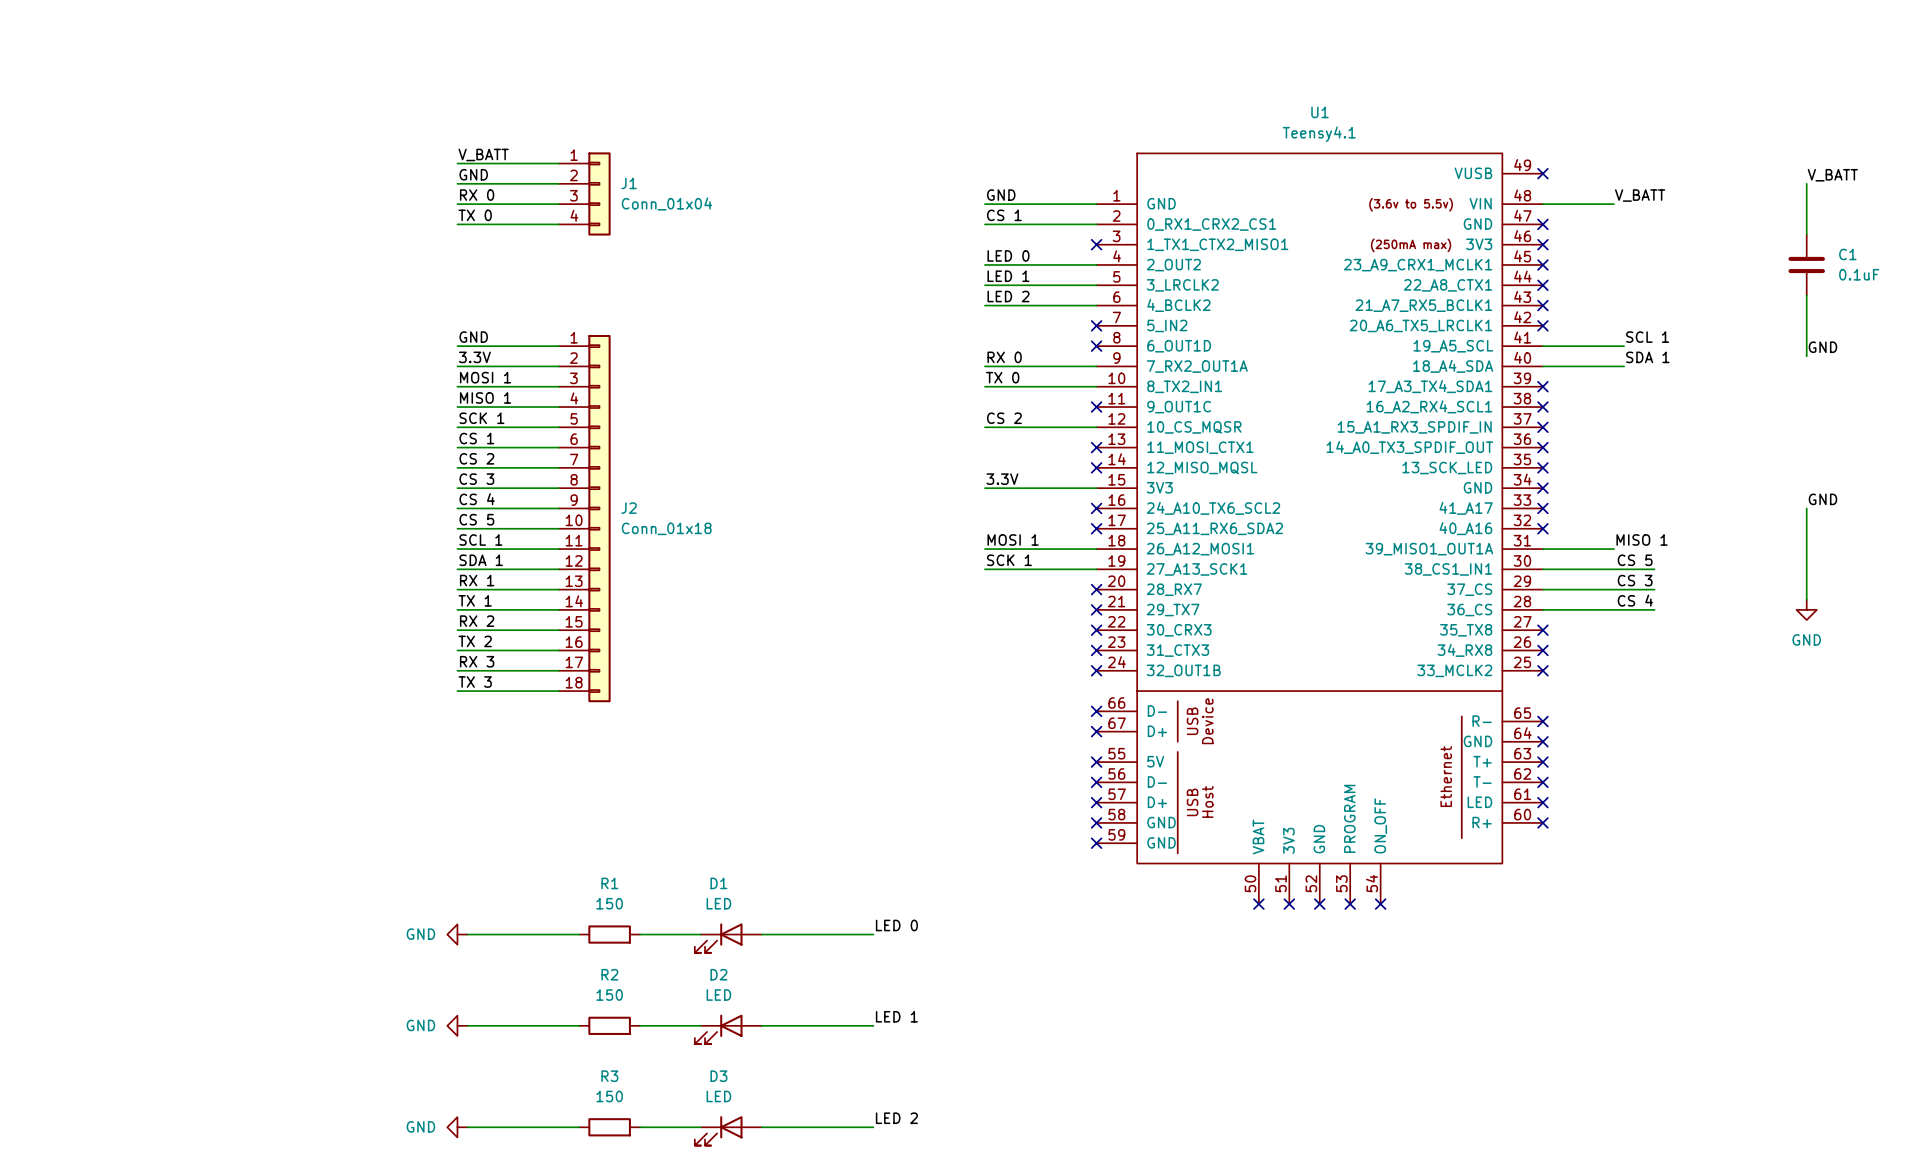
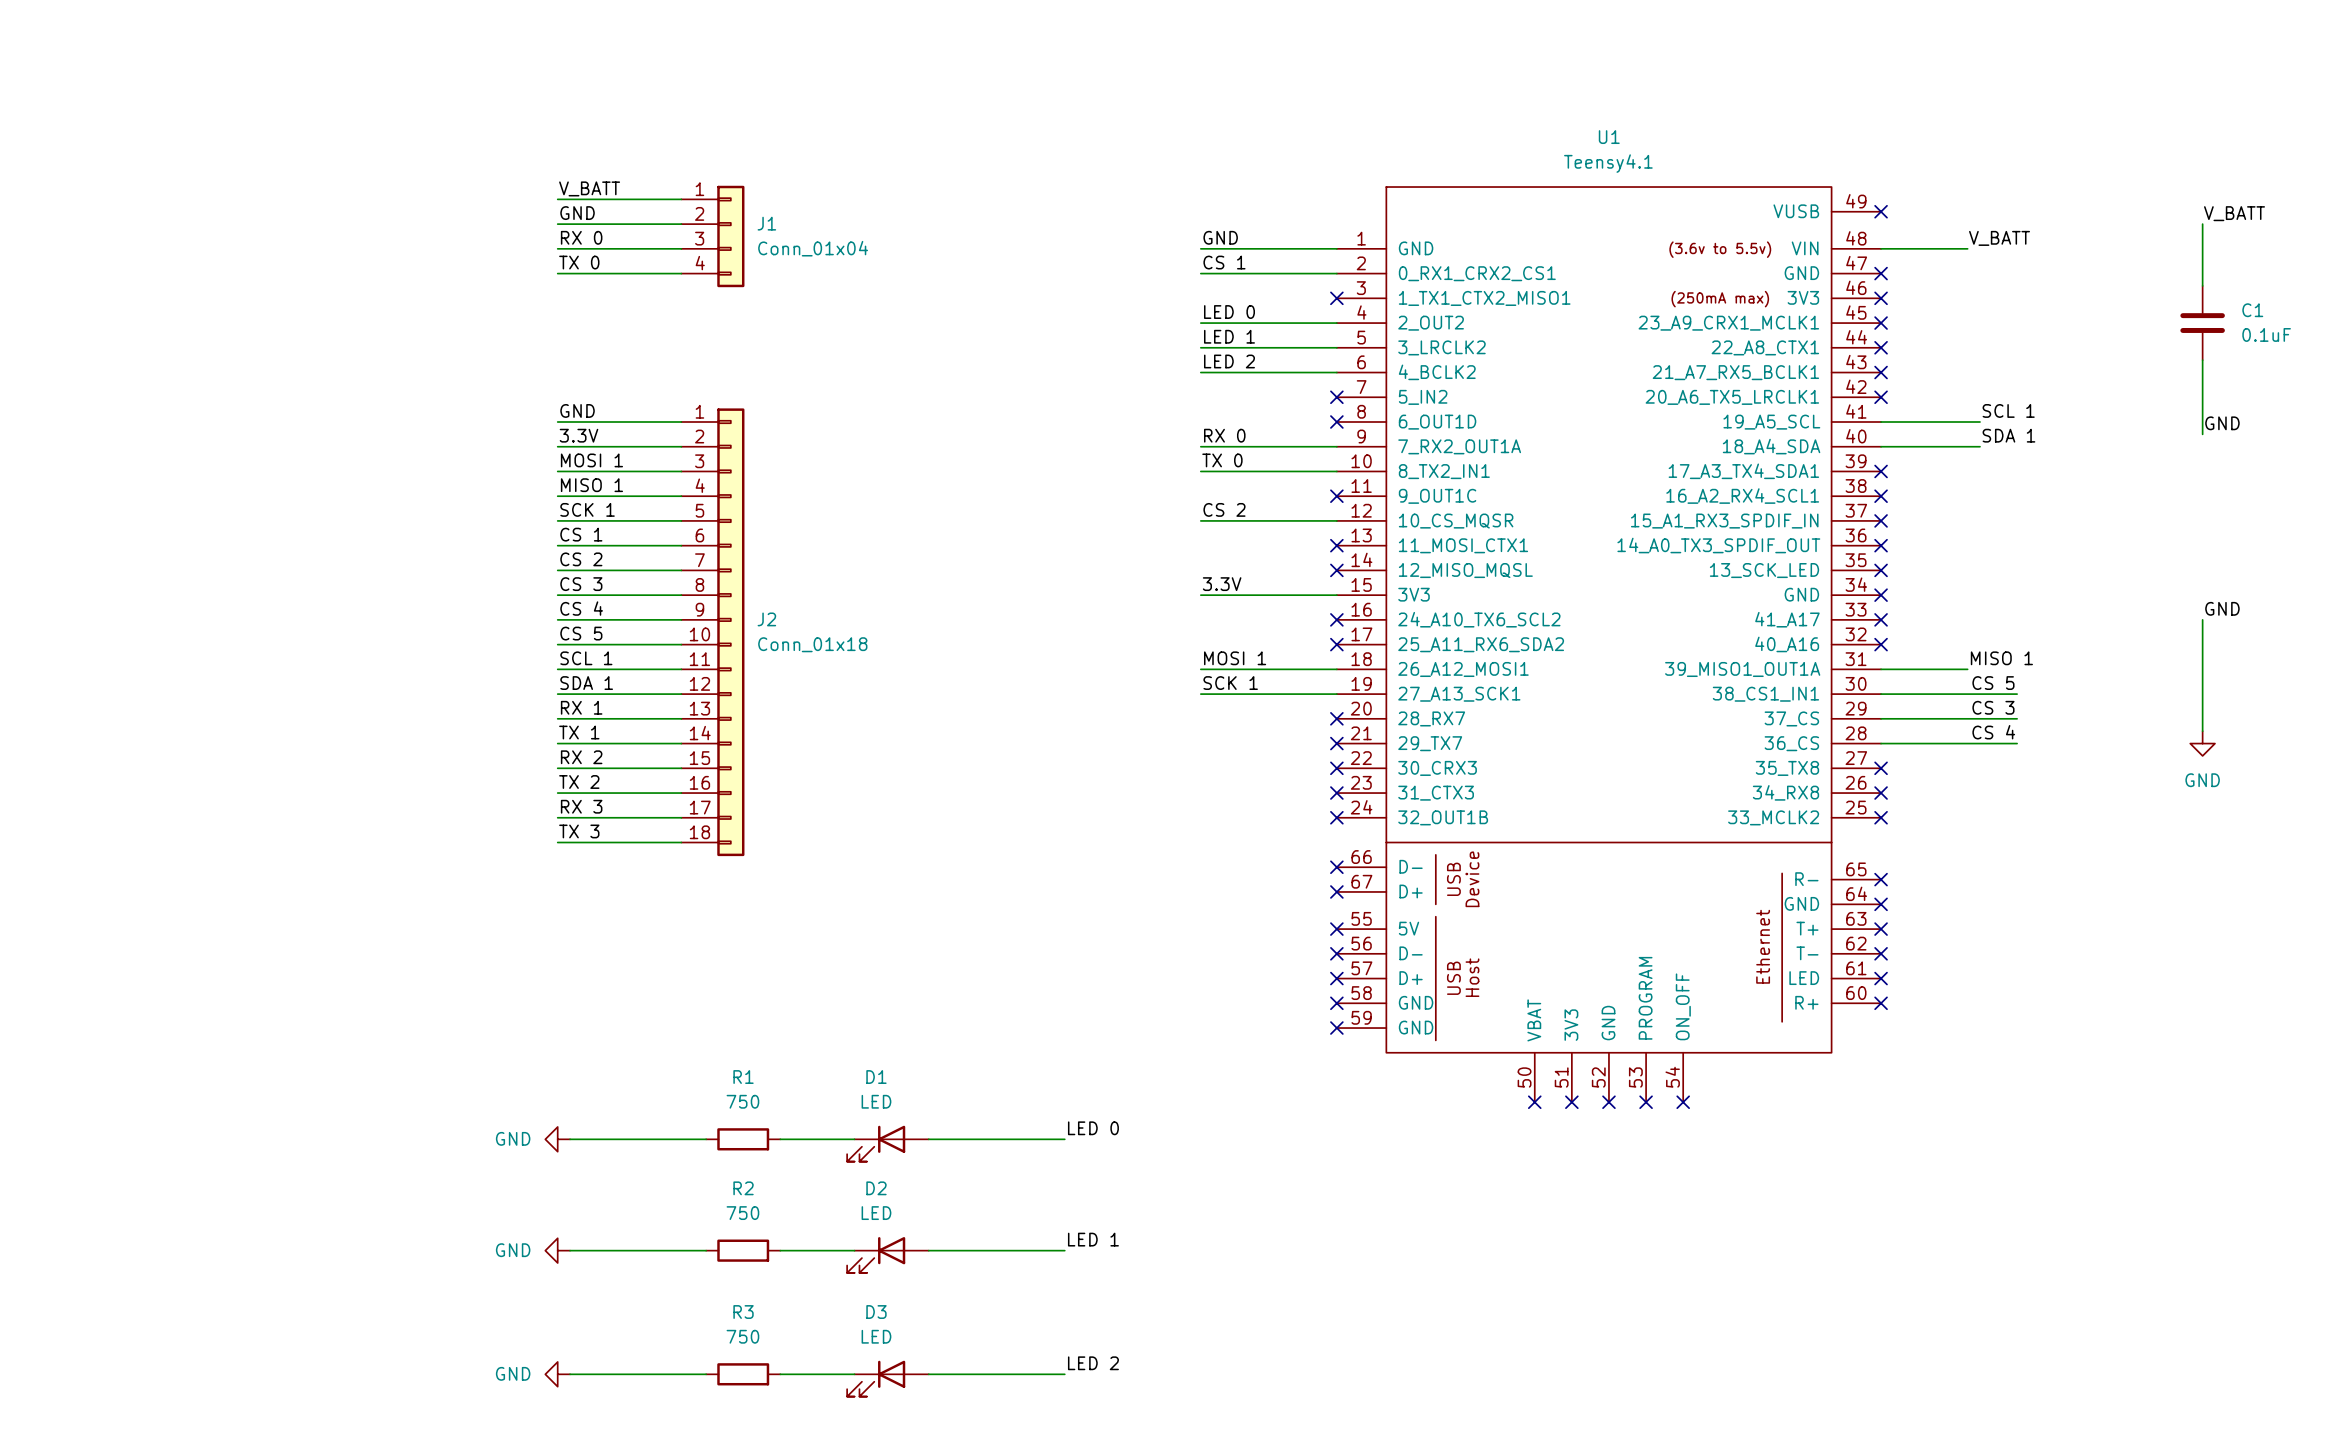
R1 value: 150 (609, 903) -> 750 (742, 1101)
R2 value: 150 (609, 995) -> 750 (742, 1213)
R3 value: 150 (609, 1096) -> 750 (742, 1336)

